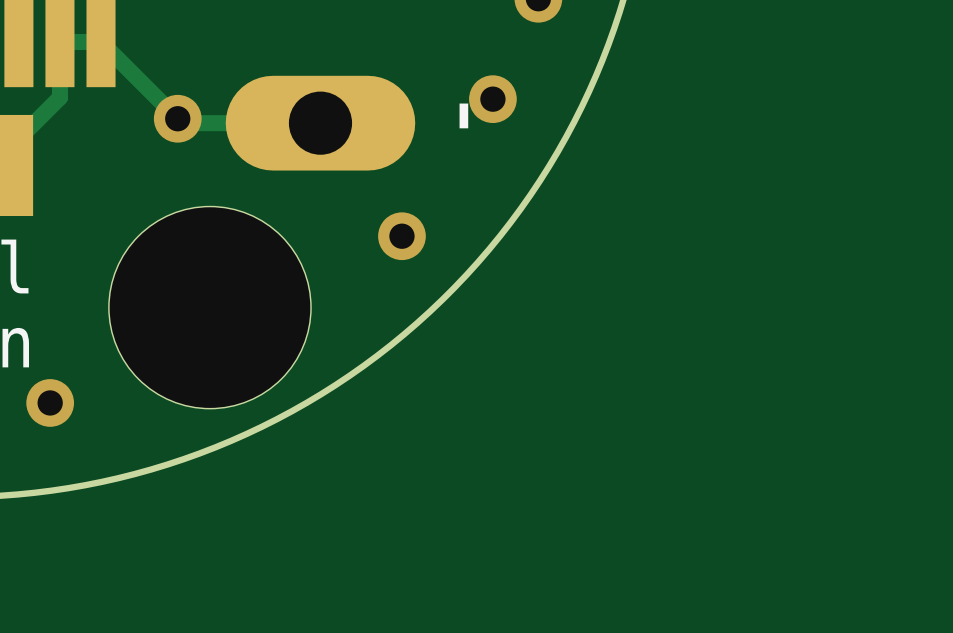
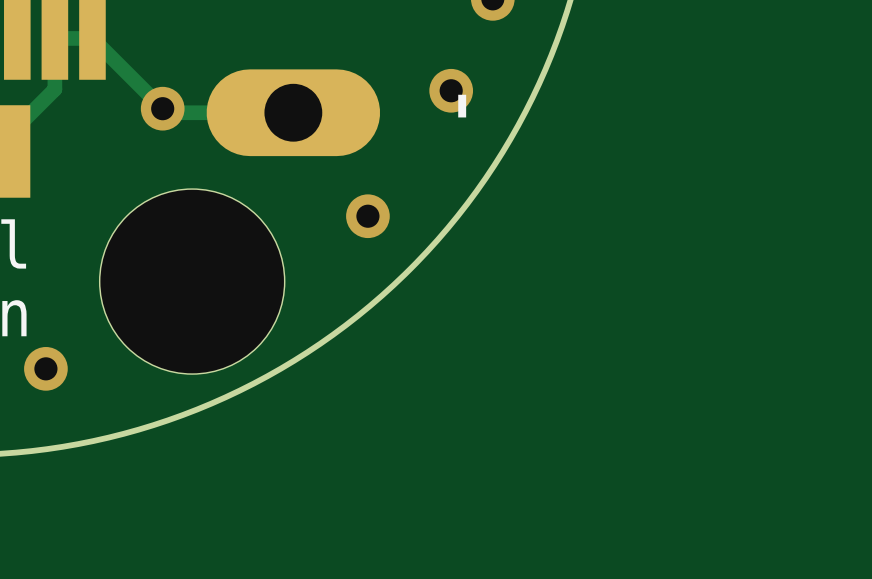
text position: - (463, 115) -> - (462, 106)

